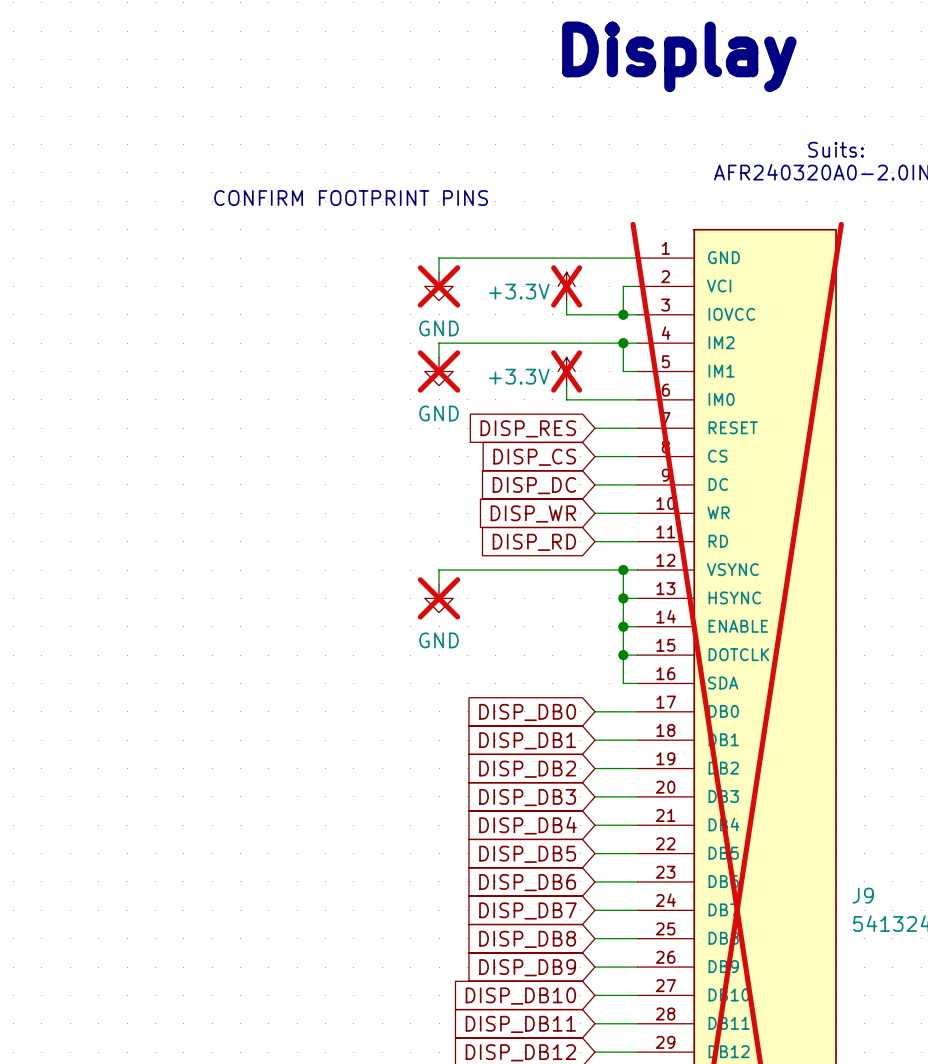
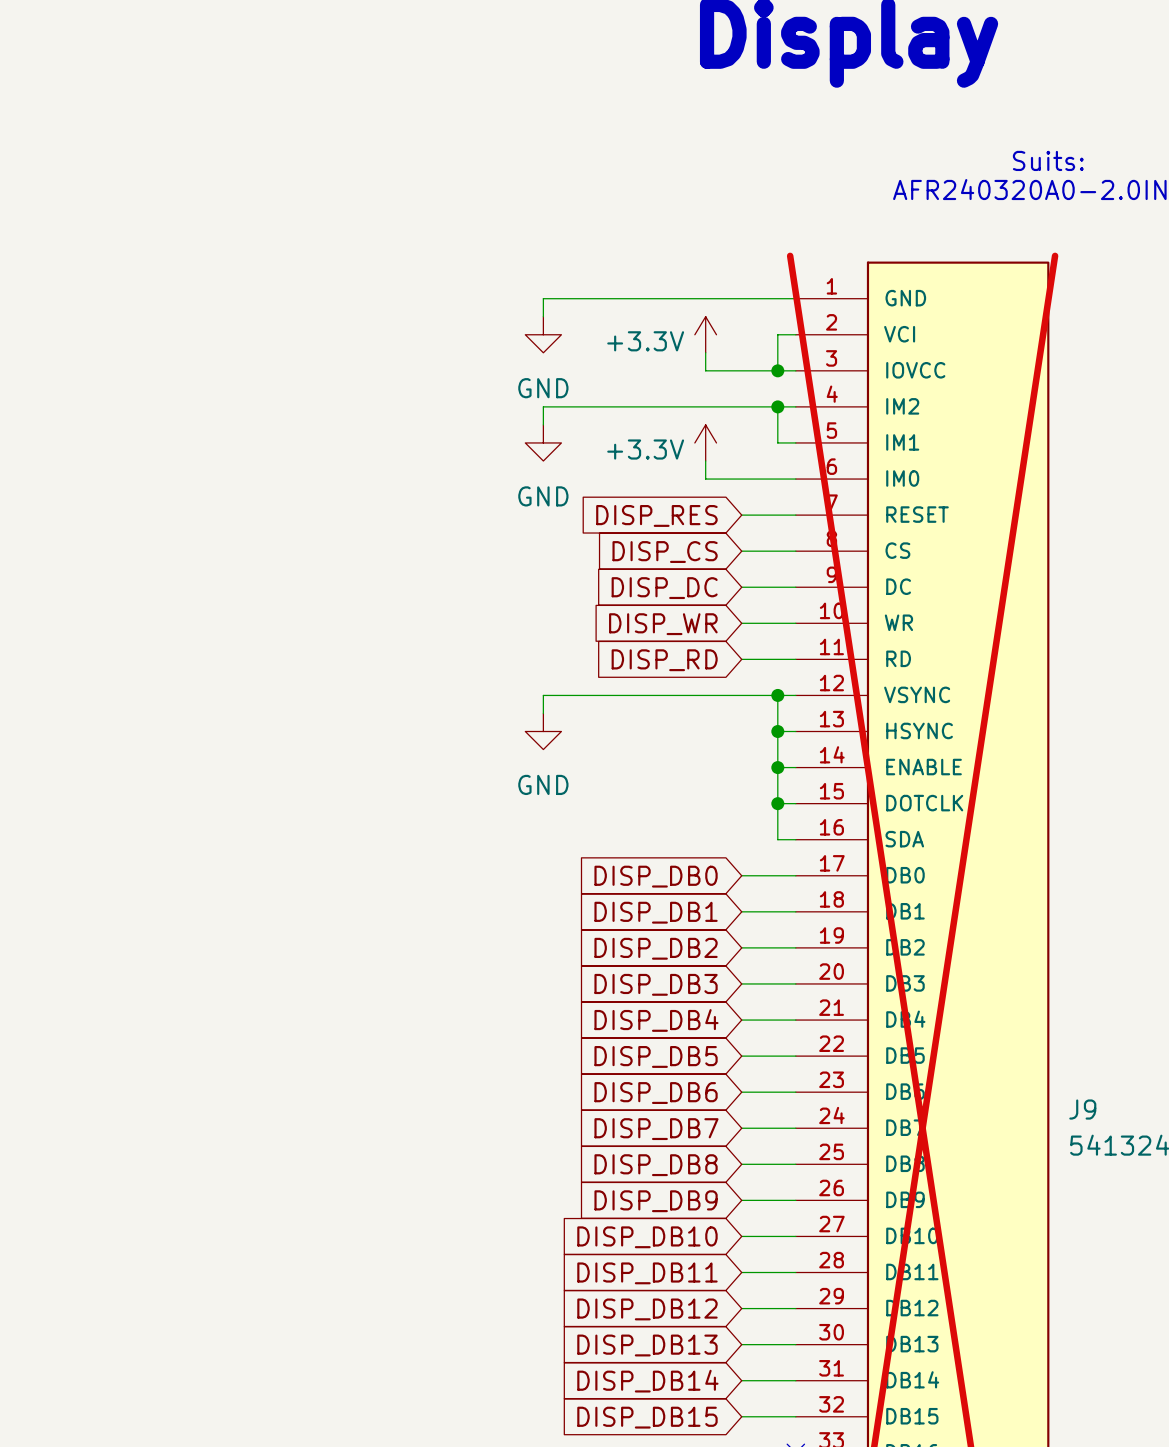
text: CONFIRM FOOTPRINT PINS (351, 198) -> none
power symbol do-not-place cross: (439, 286) -> none
power symbol do-not-place cross: (566, 286) -> none
power symbol do-not-place cross: (439, 371) -> none
power symbol do-not-place cross: (566, 371) -> none
power symbol do-not-place cross: (439, 598) -> none

